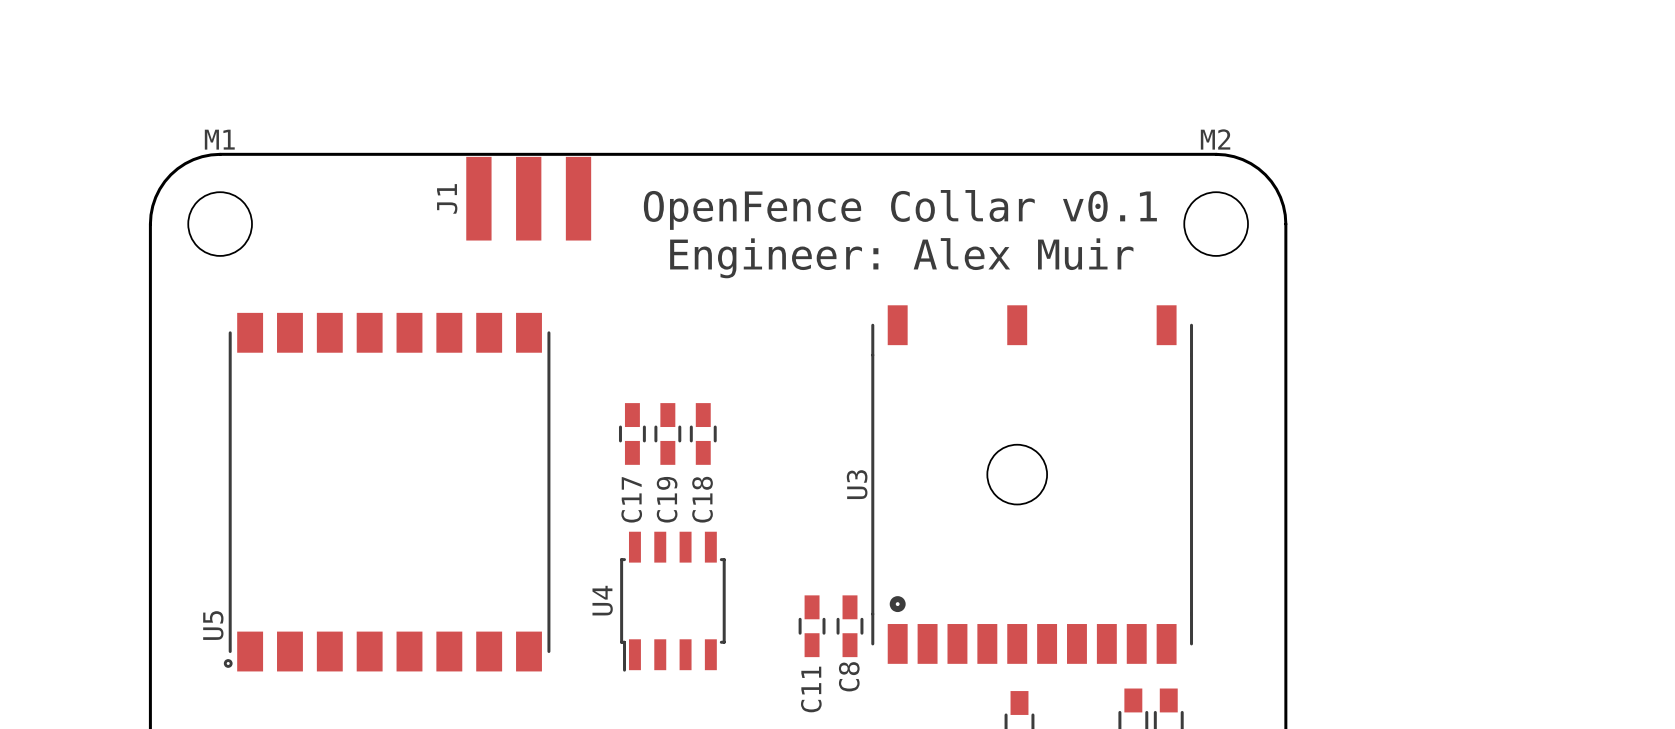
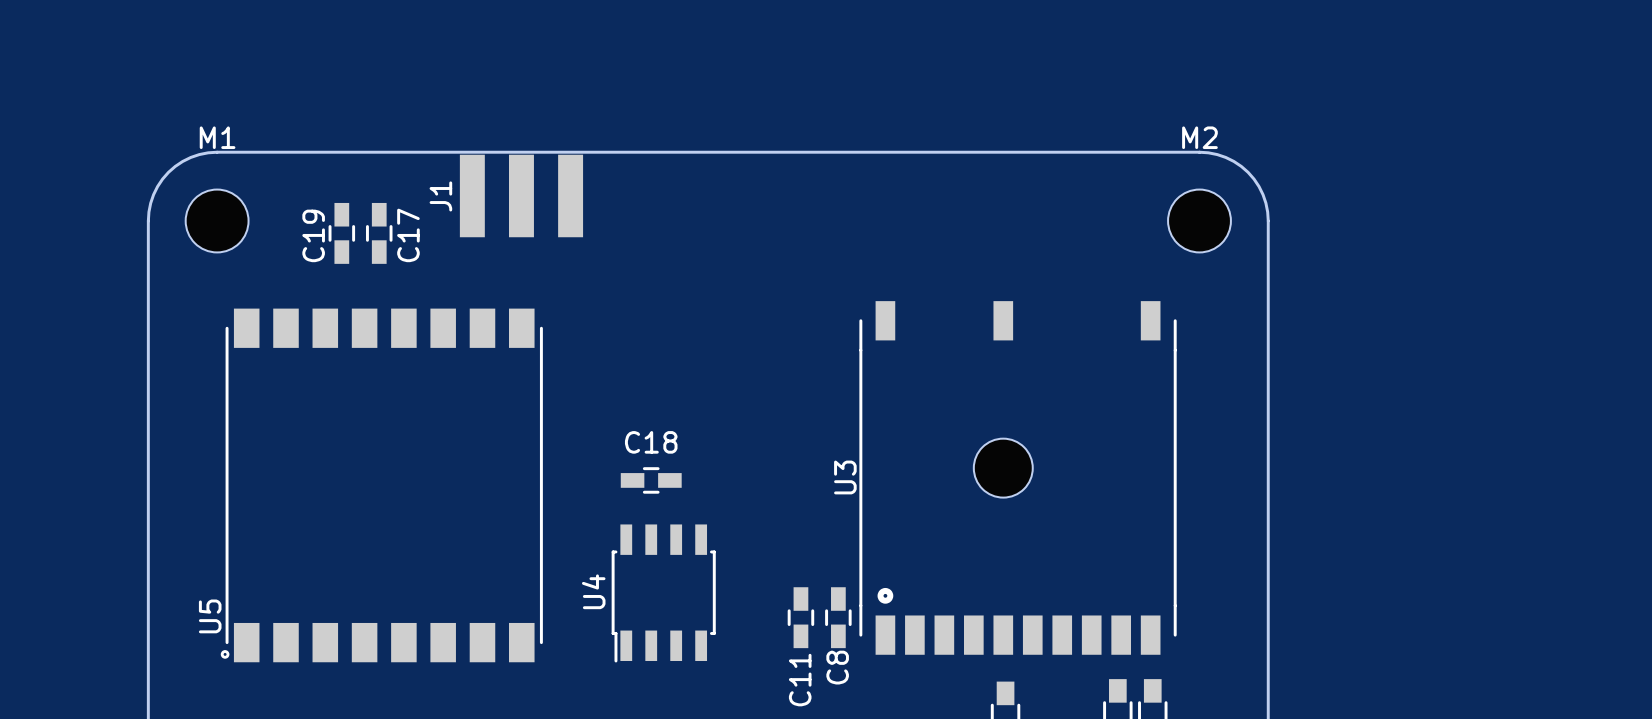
text: OpenFence Collar v0.1 (900, 209) -> none
text: Engineer: Alex Muir (901, 258) -> none
C17 position: (632, 433) -> (379, 233)
C19 position: (667, 433) -> (341, 233)
C18 rotation: 0° (703, 433) -> 90° clockwise (651, 480)
C18 position: (703, 433) -> (651, 480)
C17 name position: C17 (631, 499) -> C17 (408, 235)
C19 name position: C19 (667, 499) -> C19 (313, 235)
C18 name position: C18 (702, 499) -> C18 (651, 442)

